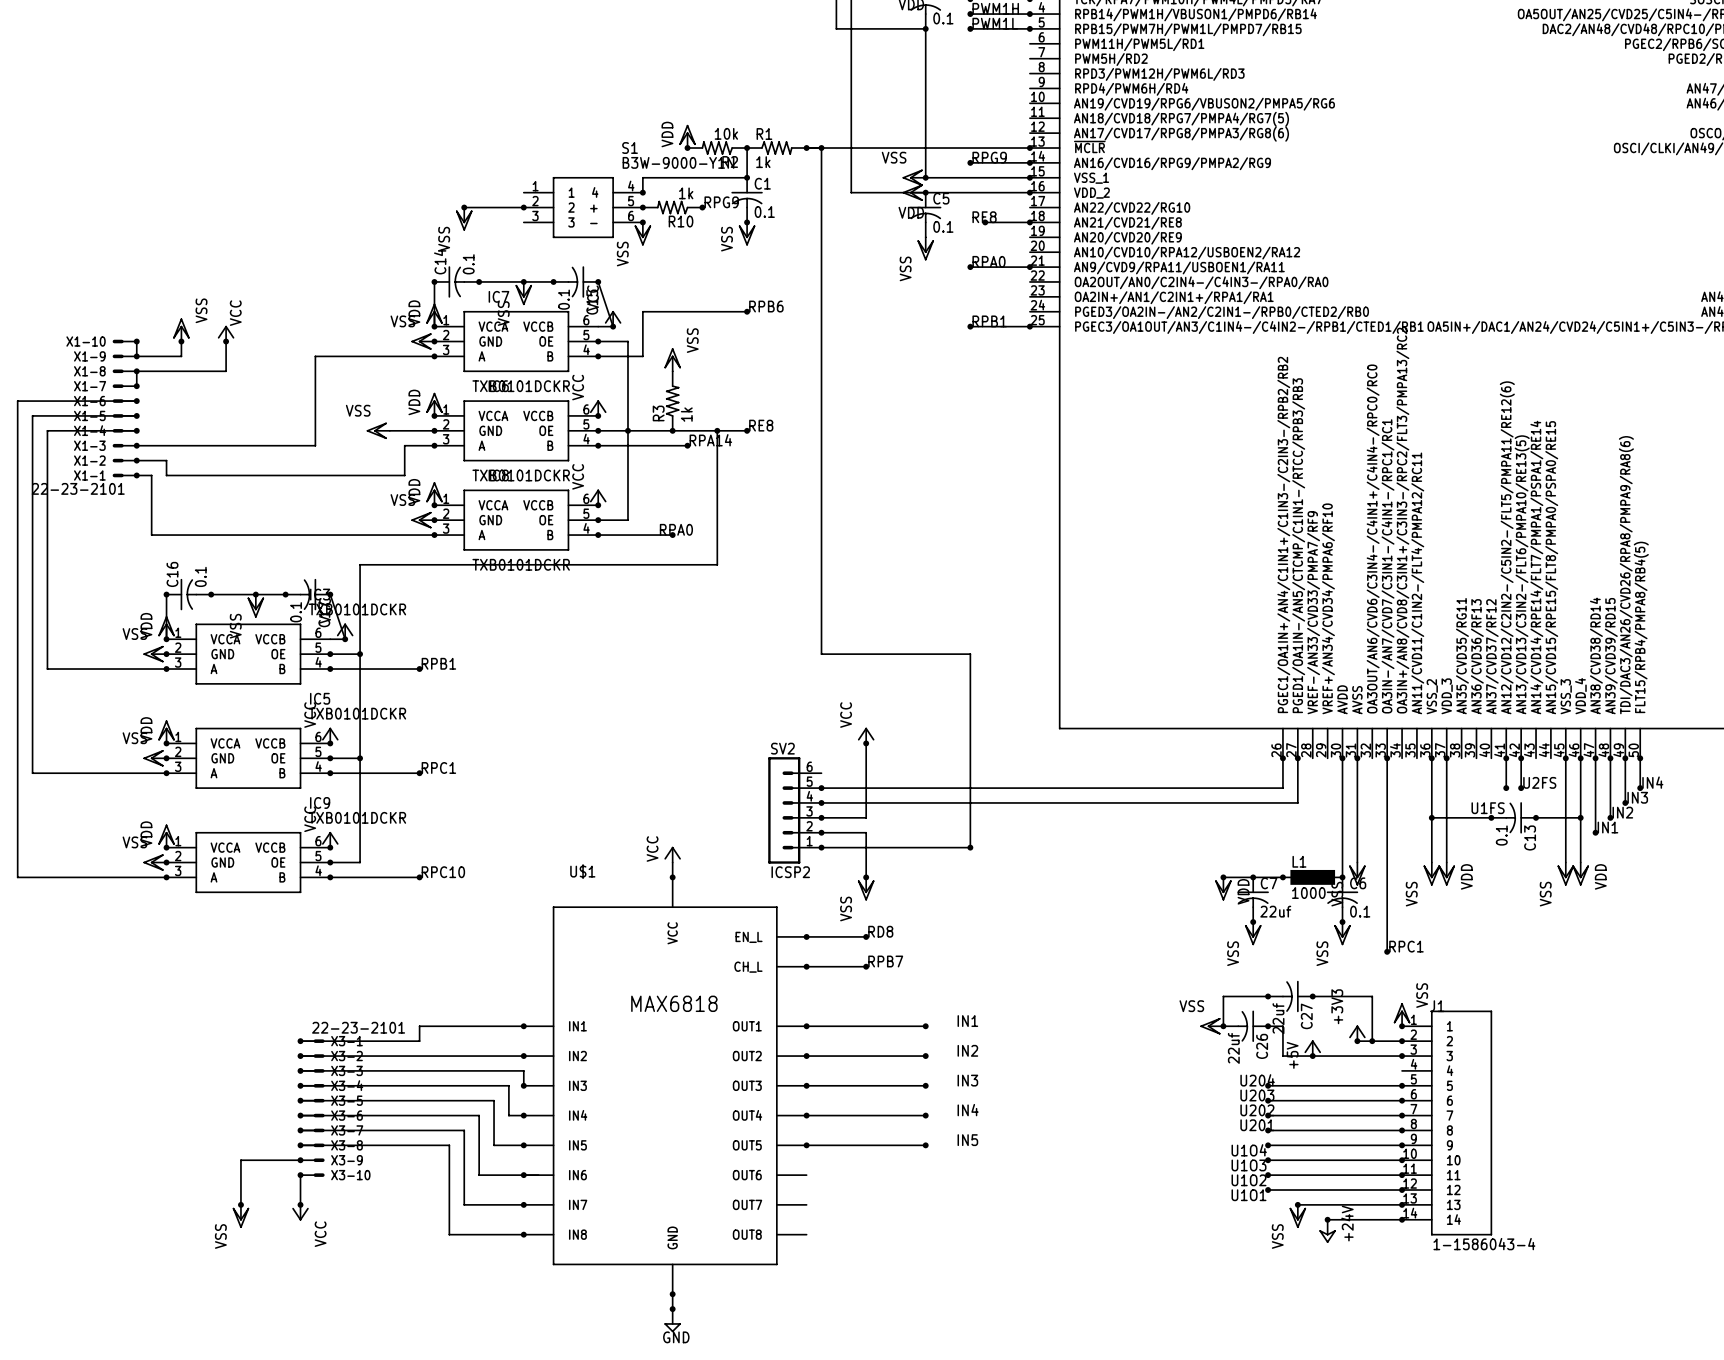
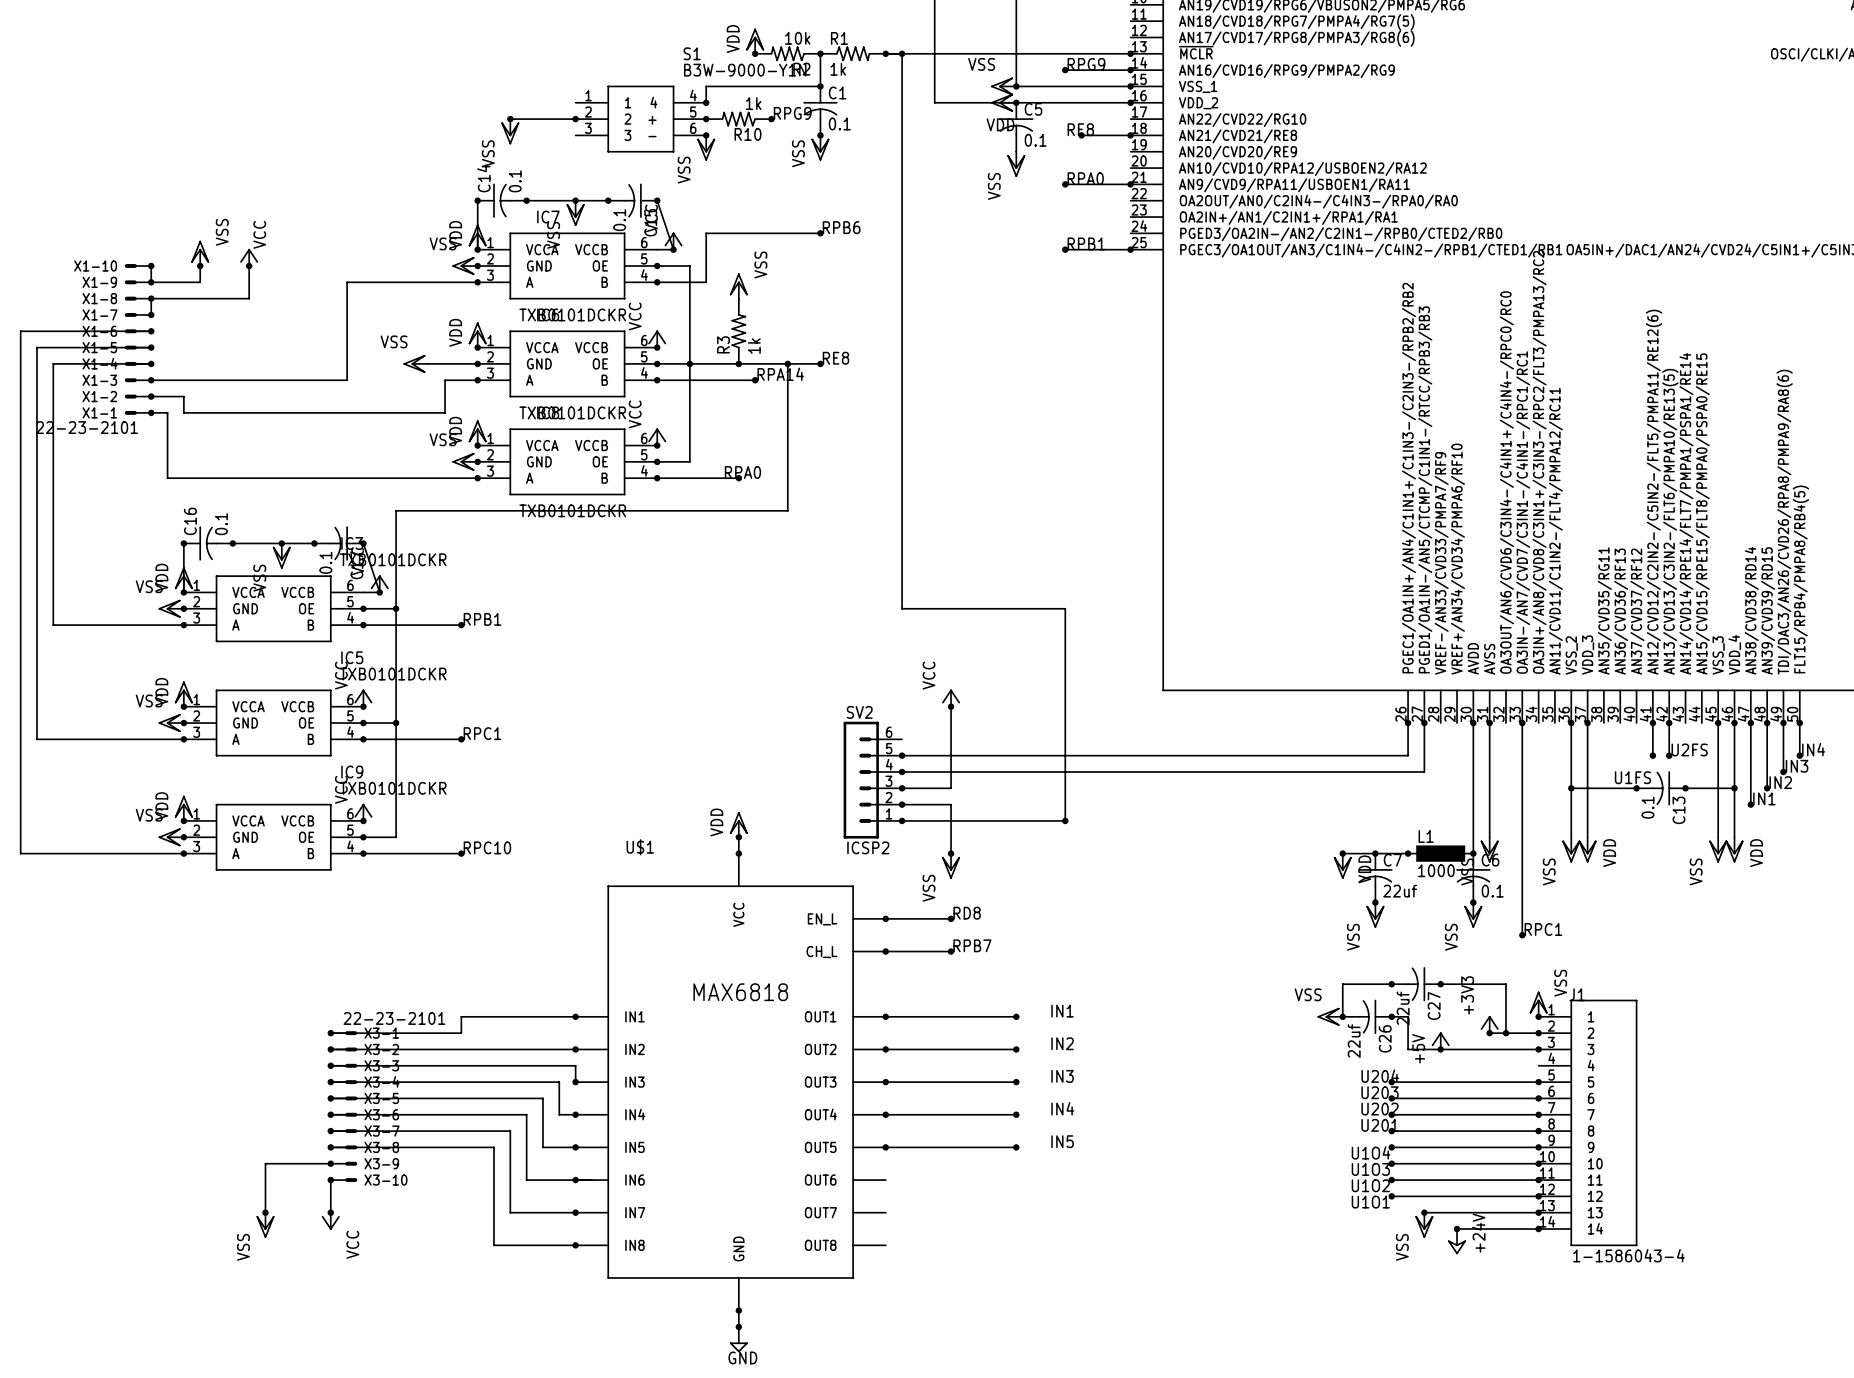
power symbol: VCC (672, 854) -> VDD (738, 824)
junction: none -> (738, 837)

